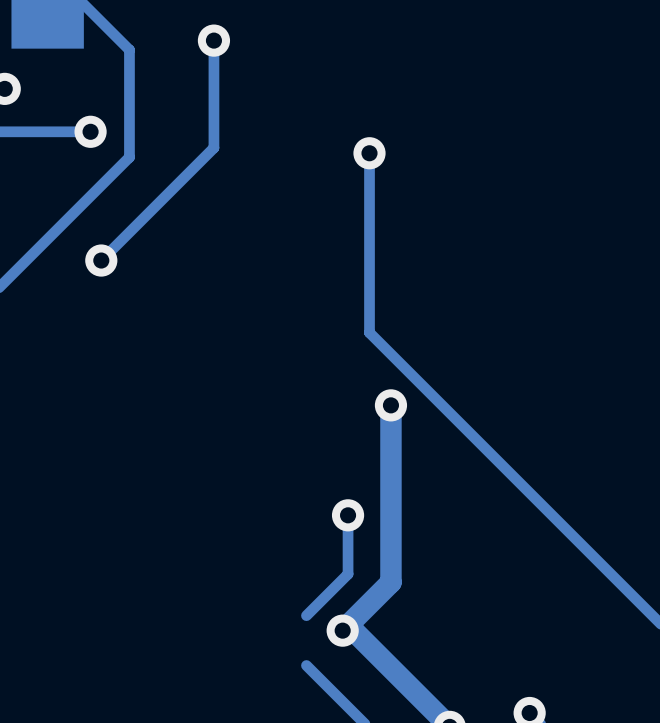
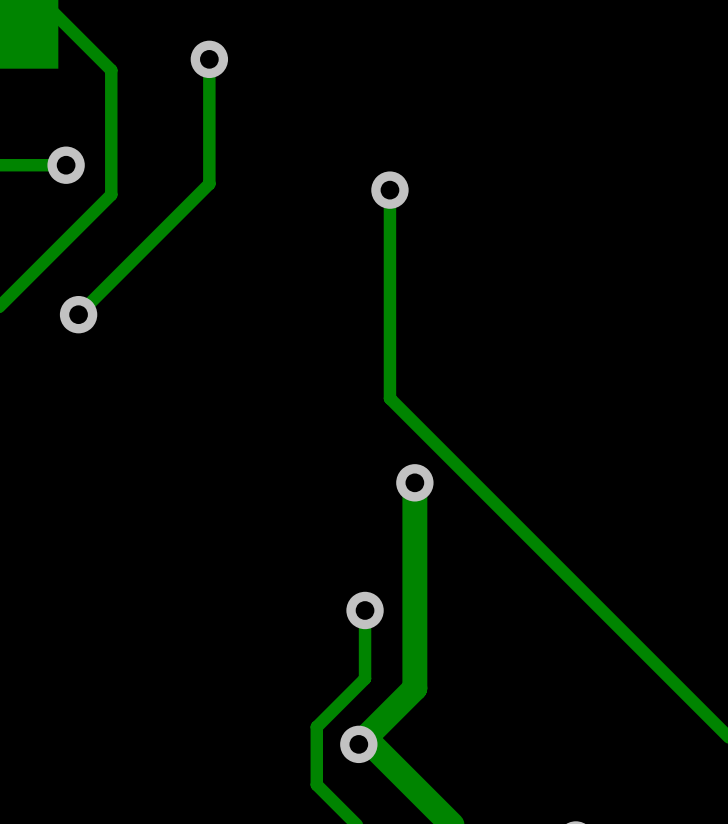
track: none -> (316, 726) (316, 784)

